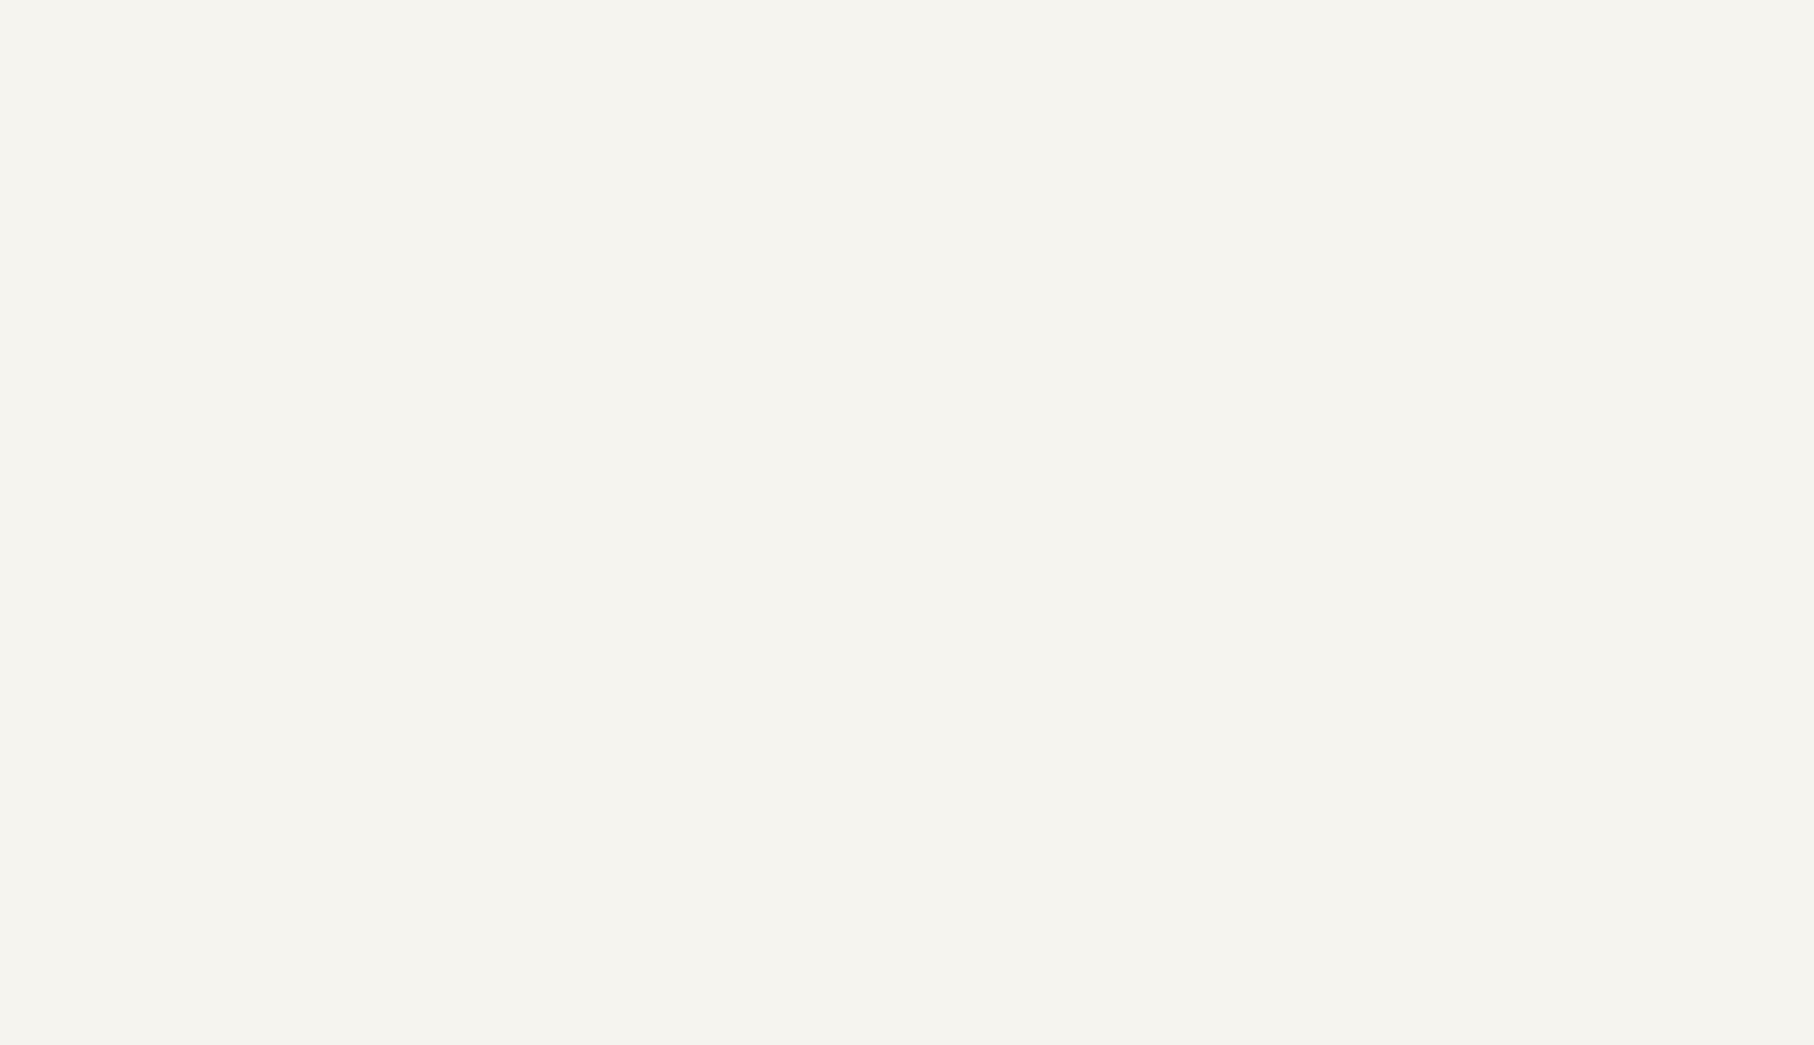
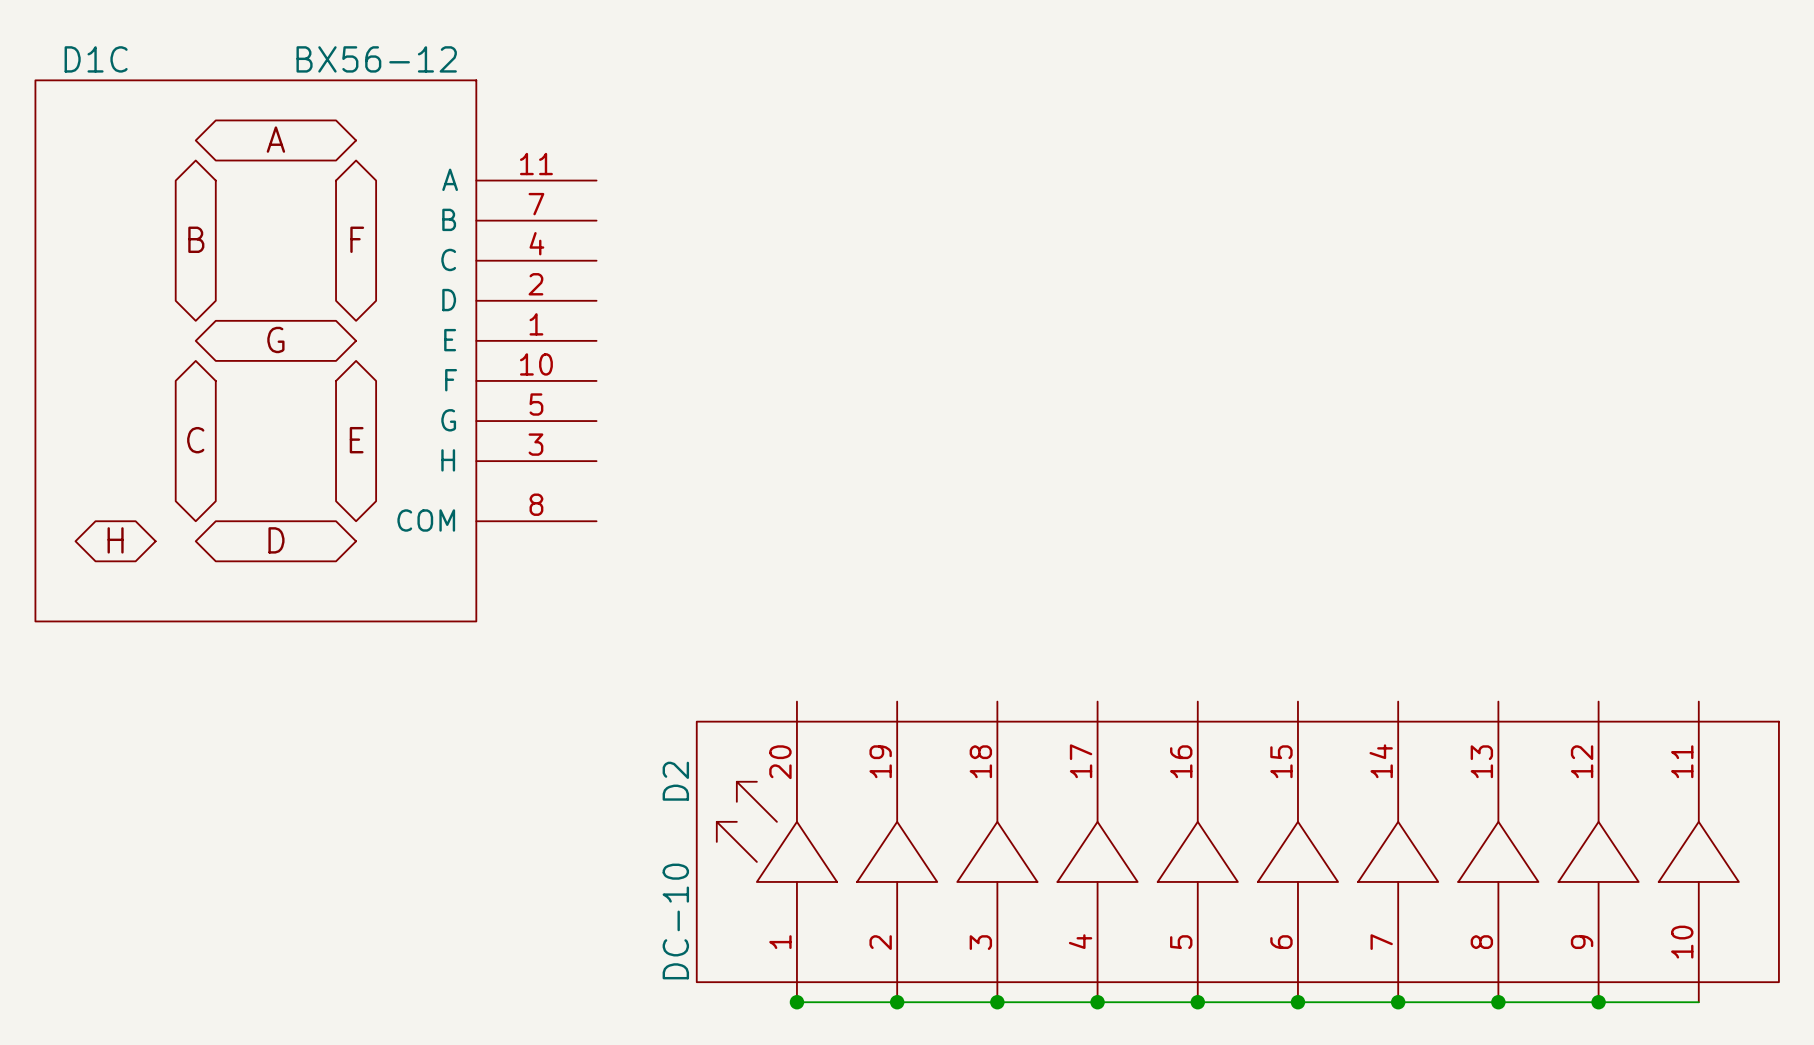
D1C: none -> BX56-12 (315, 350)
D2: none -> DC-10 (1237, 851)
wire: none -> (796, 1002) (1698, 1002)
junction: none -> (796, 1002)
junction: none -> (897, 1002)
junction: none -> (997, 1002)
junction: none -> (1097, 1002)
junction: none -> (1197, 1002)
junction: none -> (1297, 1002)
junction: none -> (1398, 1002)
junction: none -> (1498, 1002)
junction: none -> (1598, 1002)

